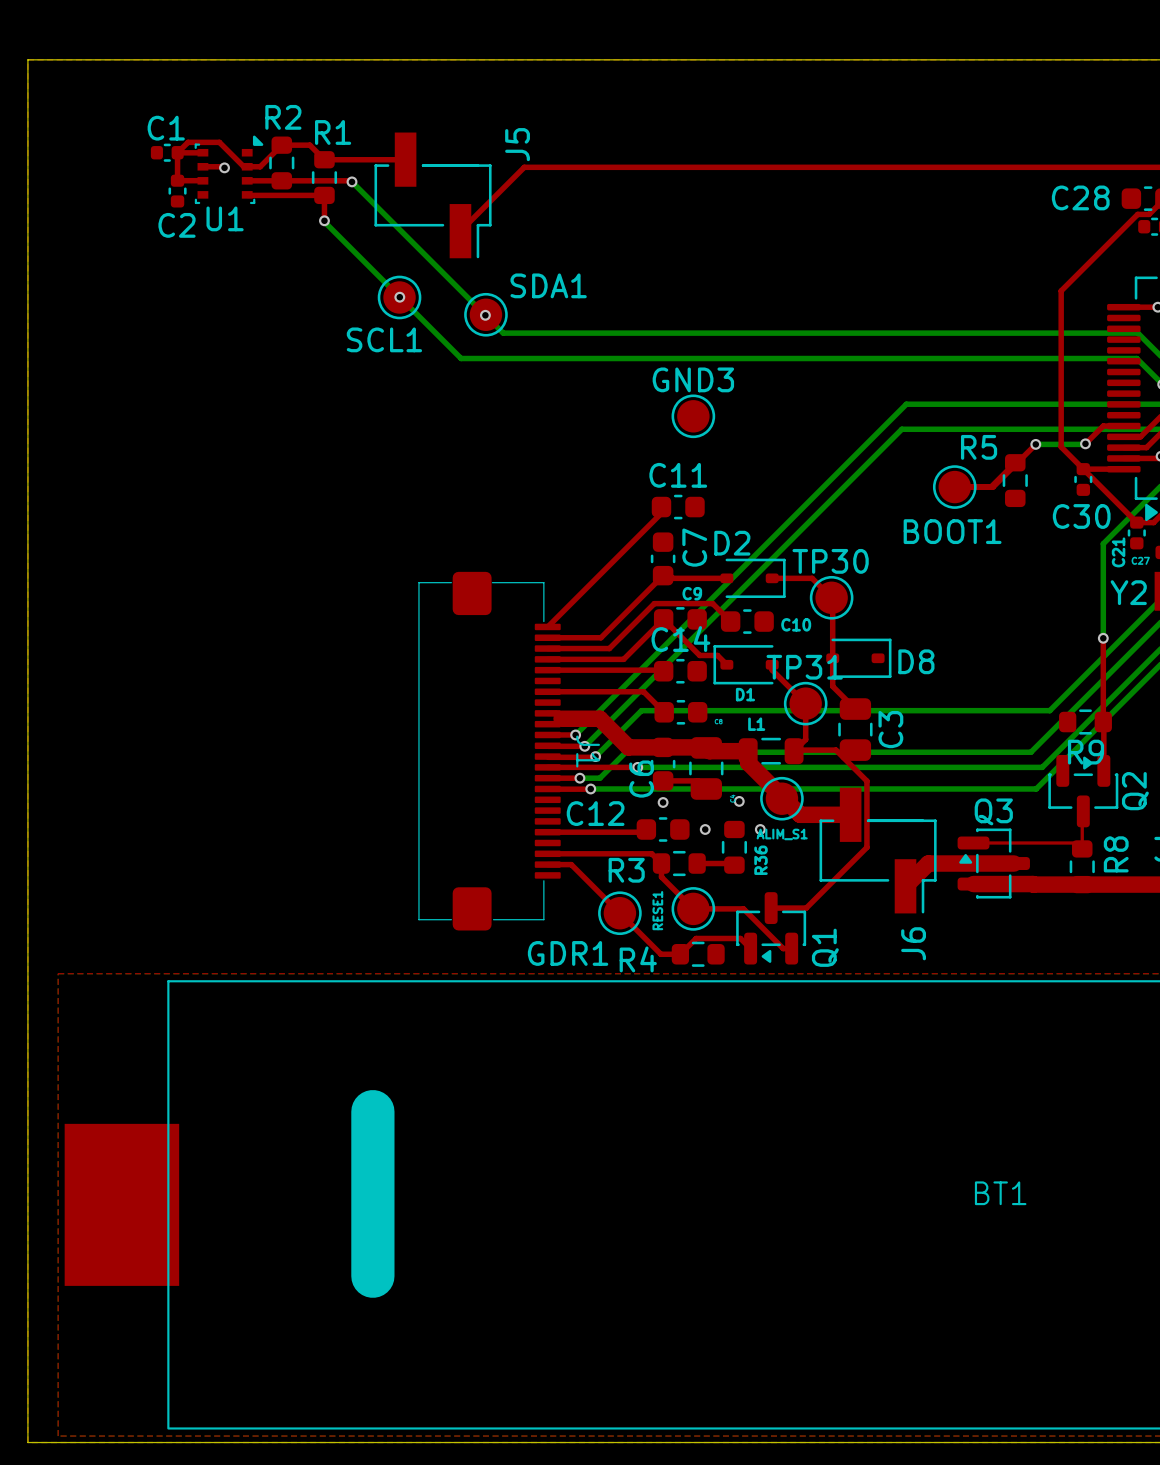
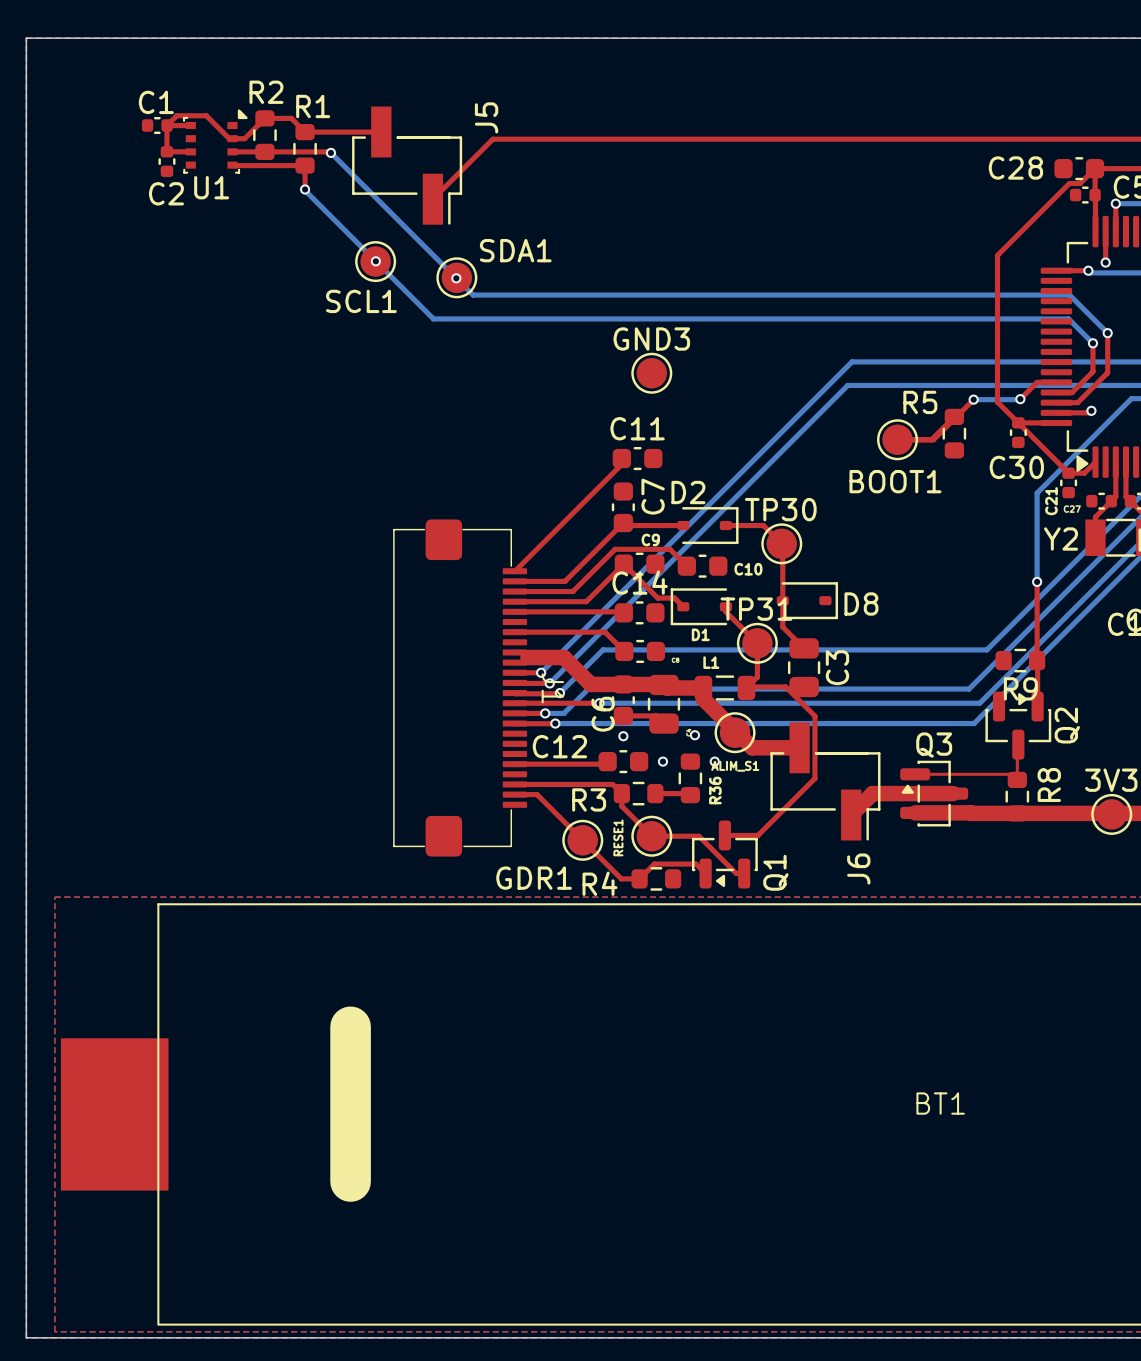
top track: (202, 166) (224, 167) -> none
via: (224, 167) -> none

